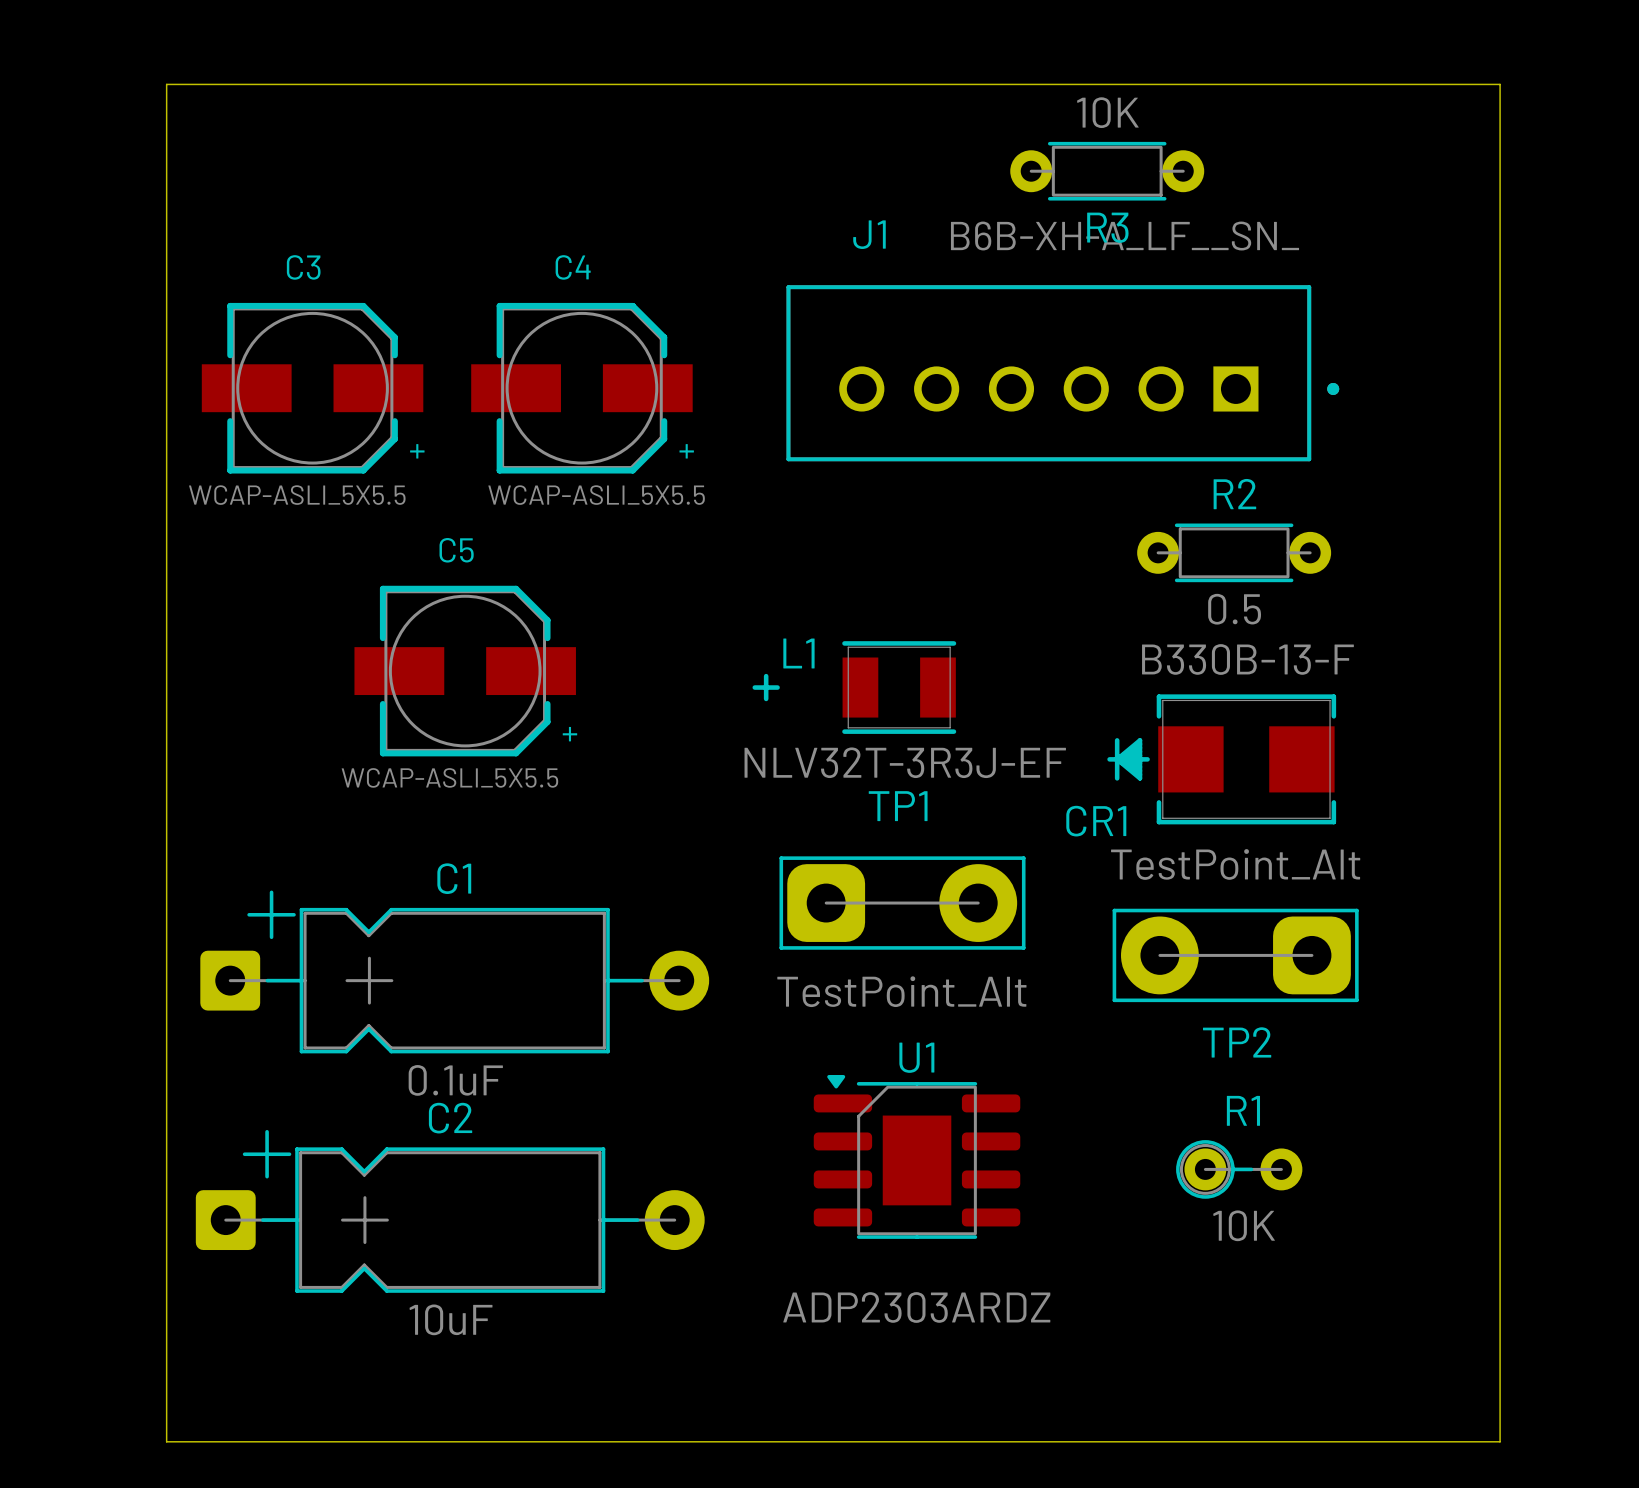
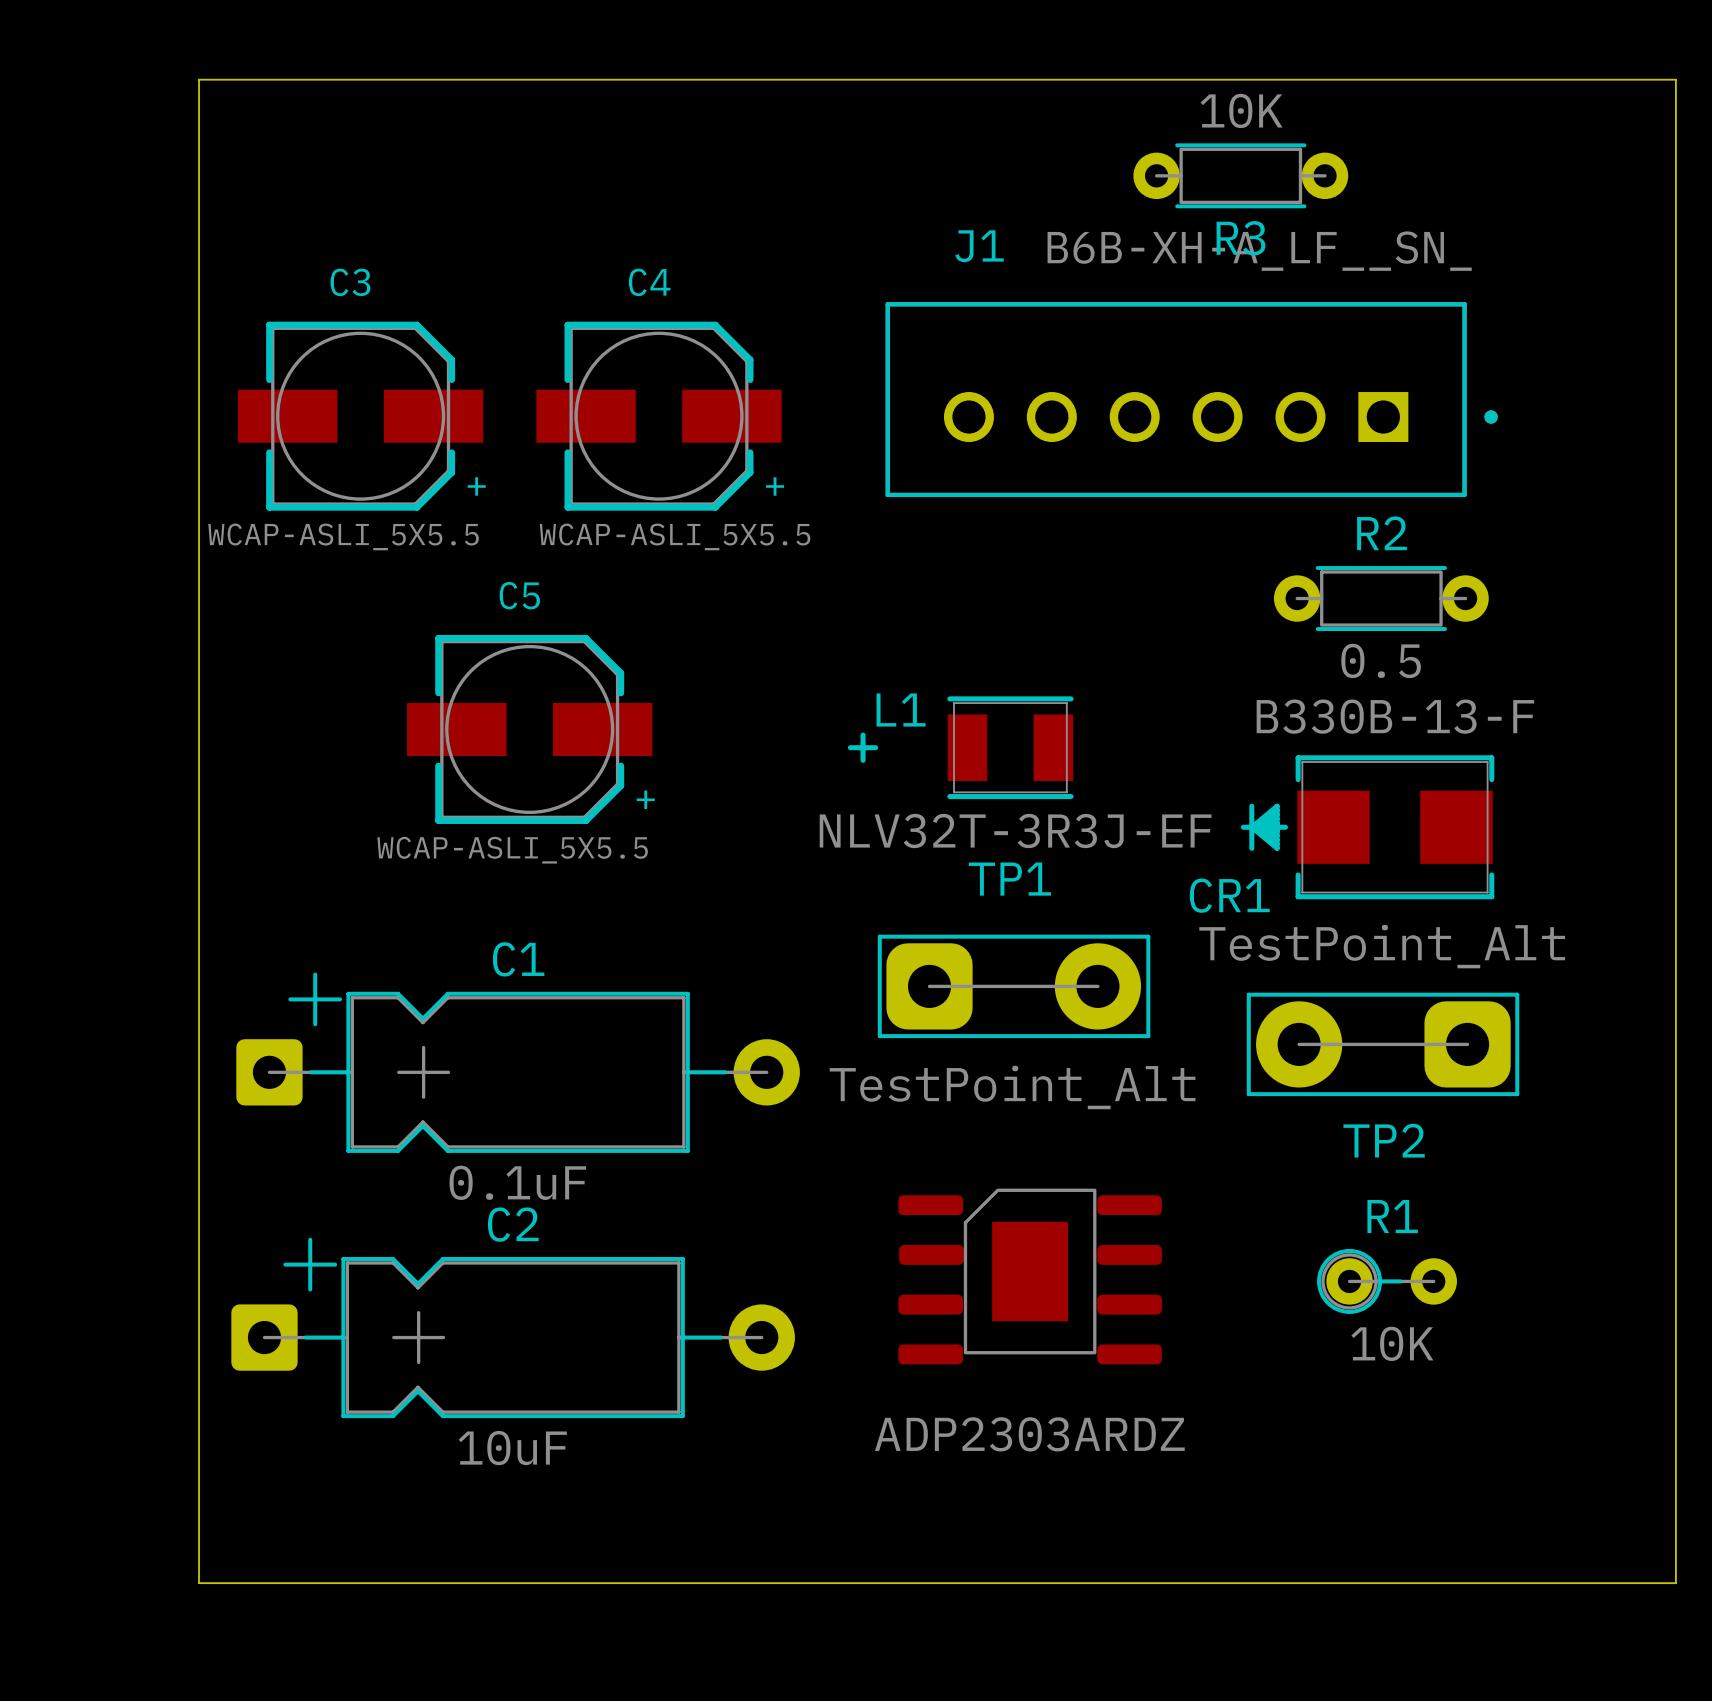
U1: ADP2303ARDZ (917, 1156) -> none
part: none -> ADP2303ARDZ (1030, 1276)

